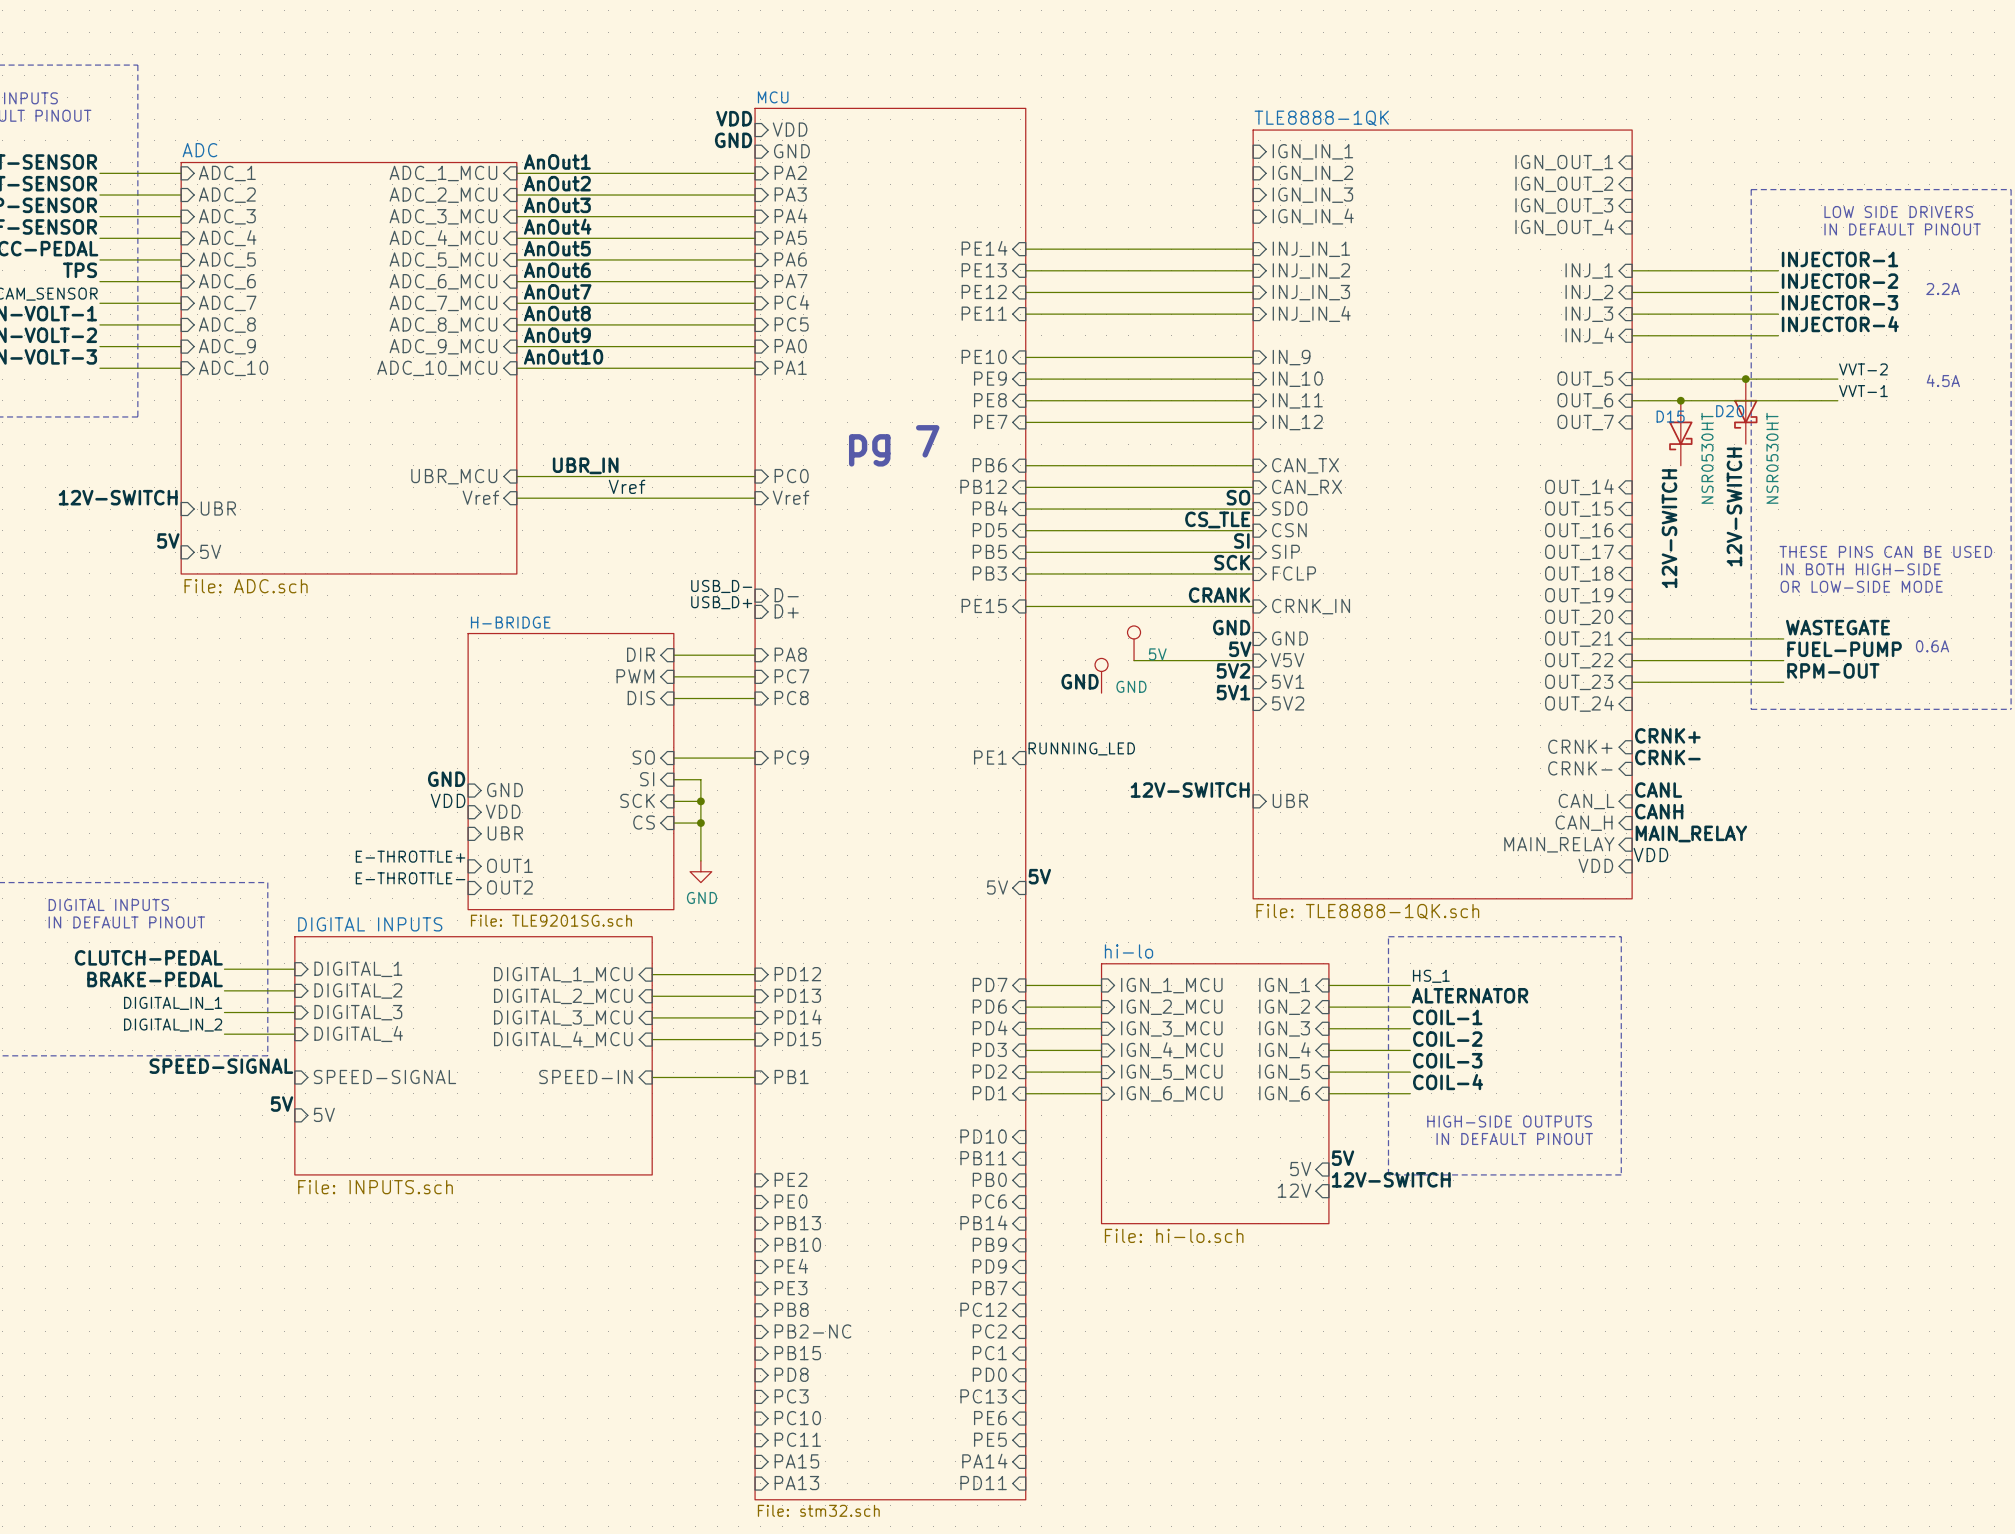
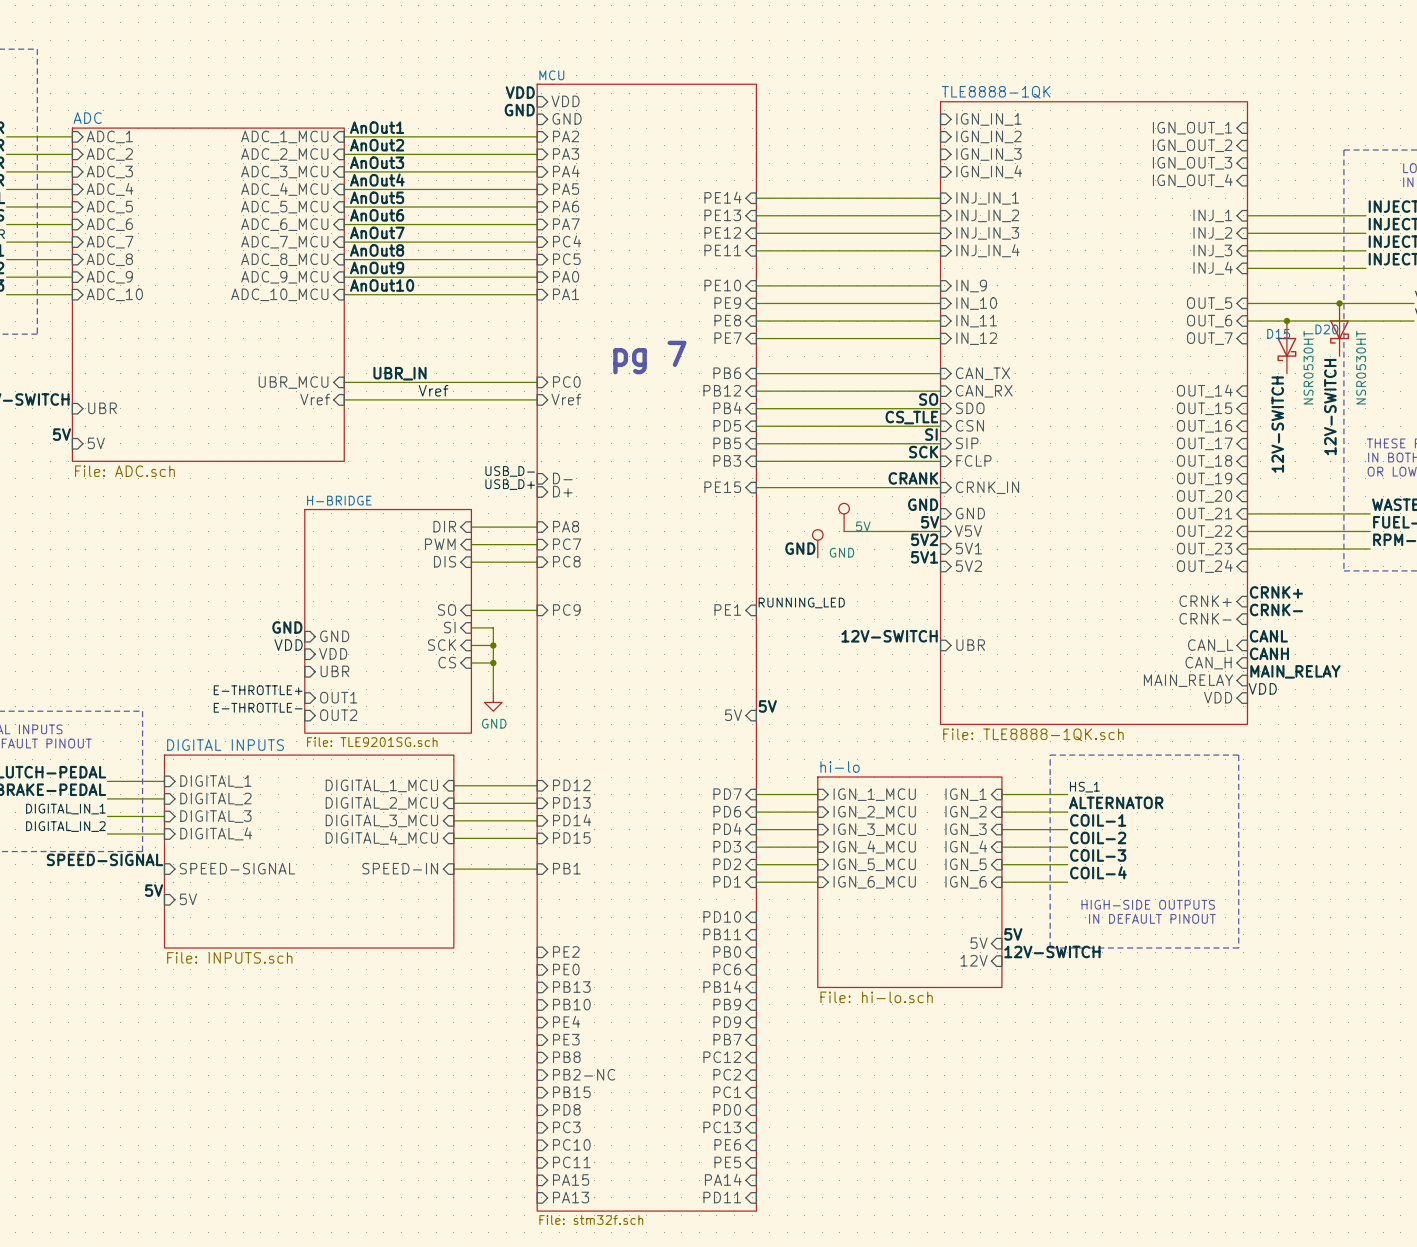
sheet MCU value: File: stm32.sch (818, 1510) -> File: stm32f.sch (591, 1220)

